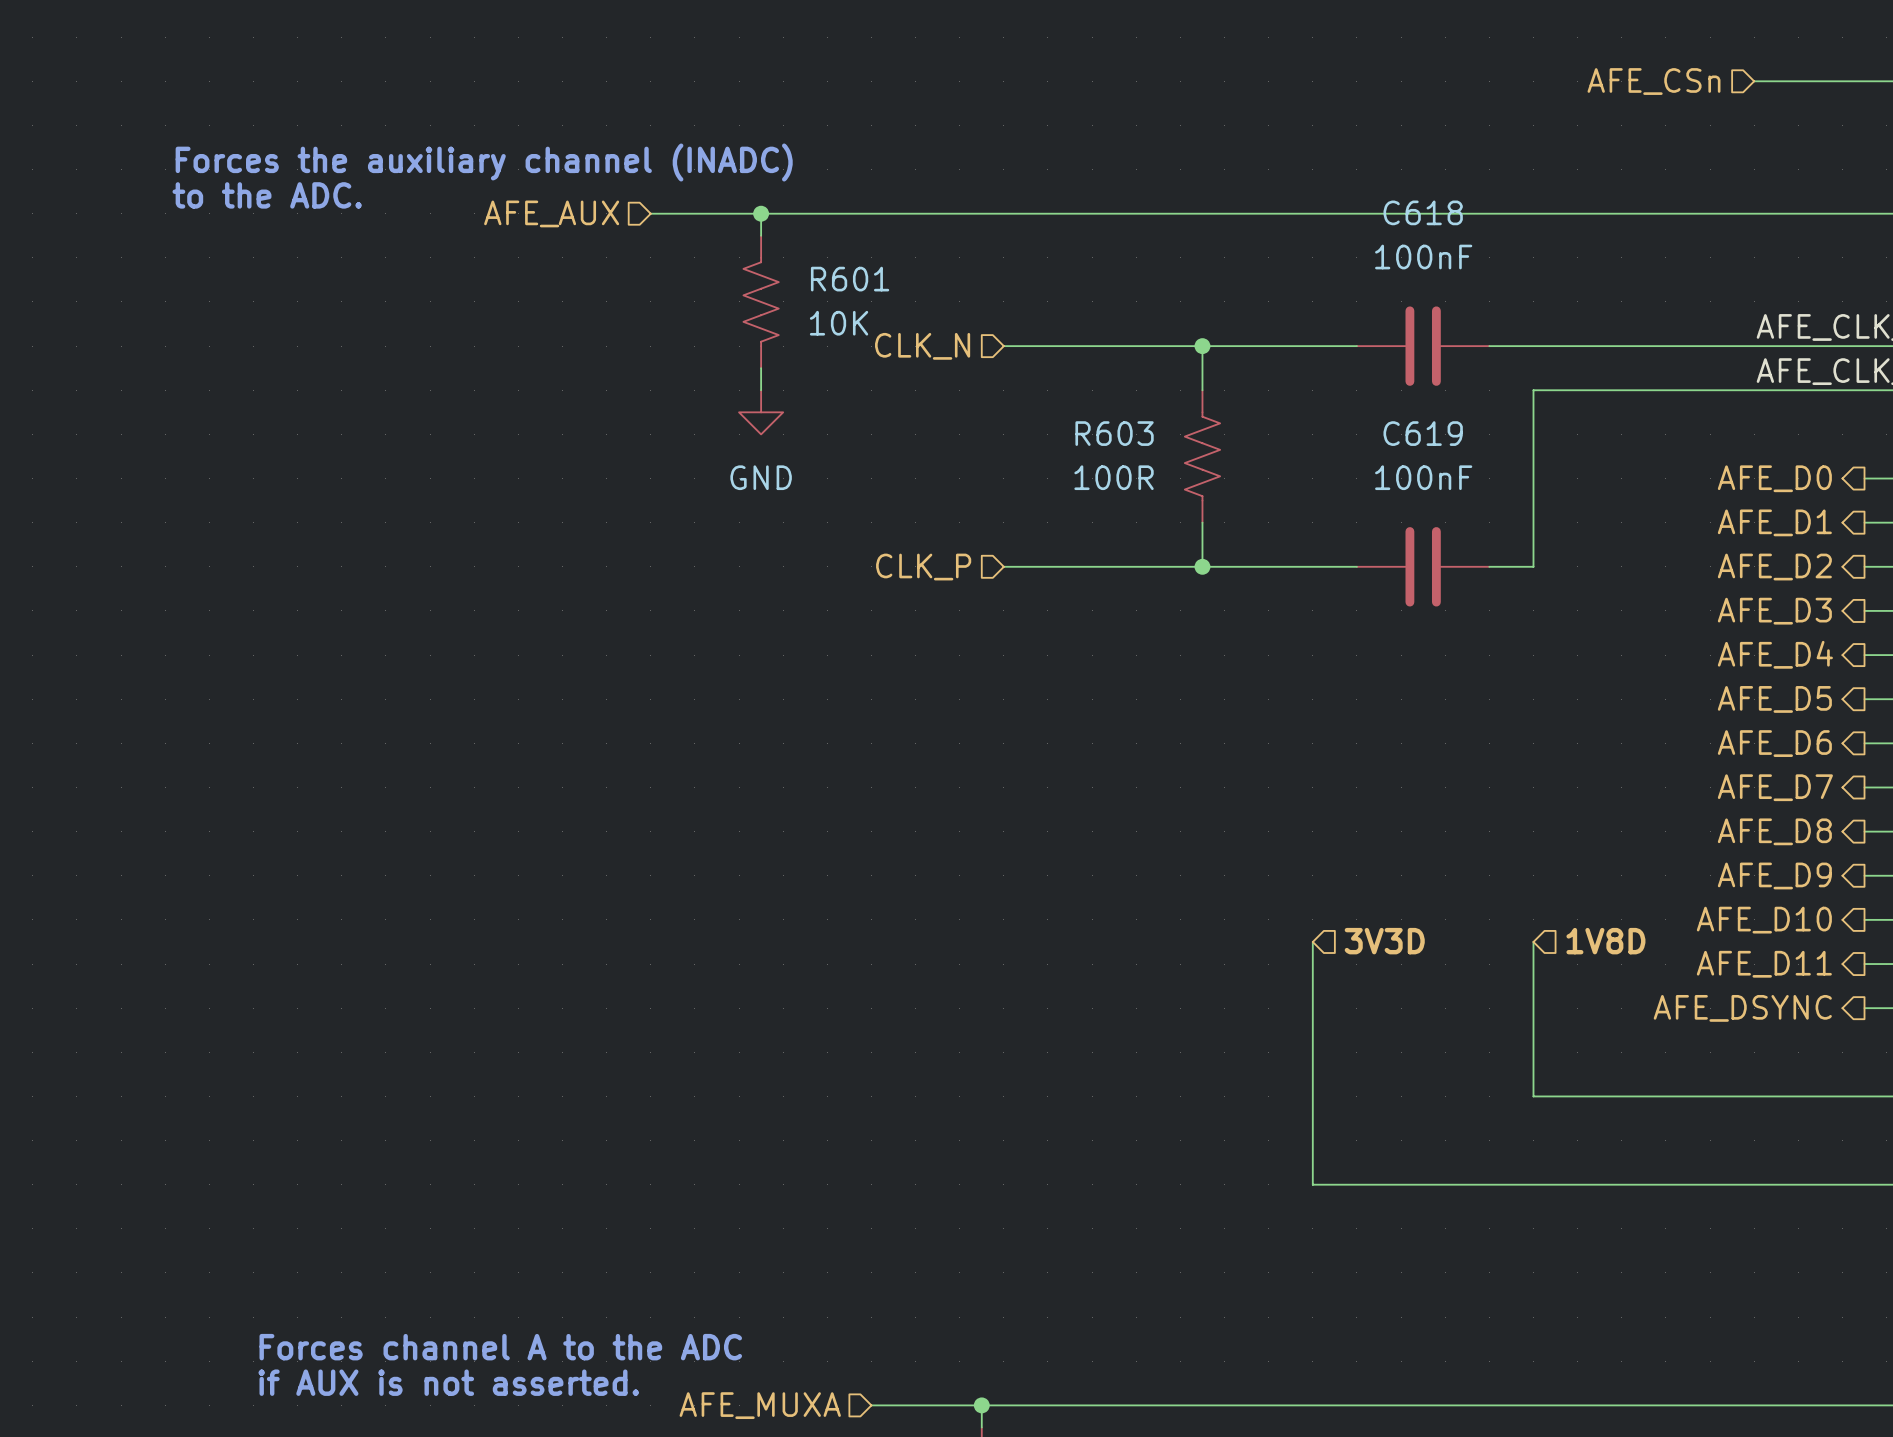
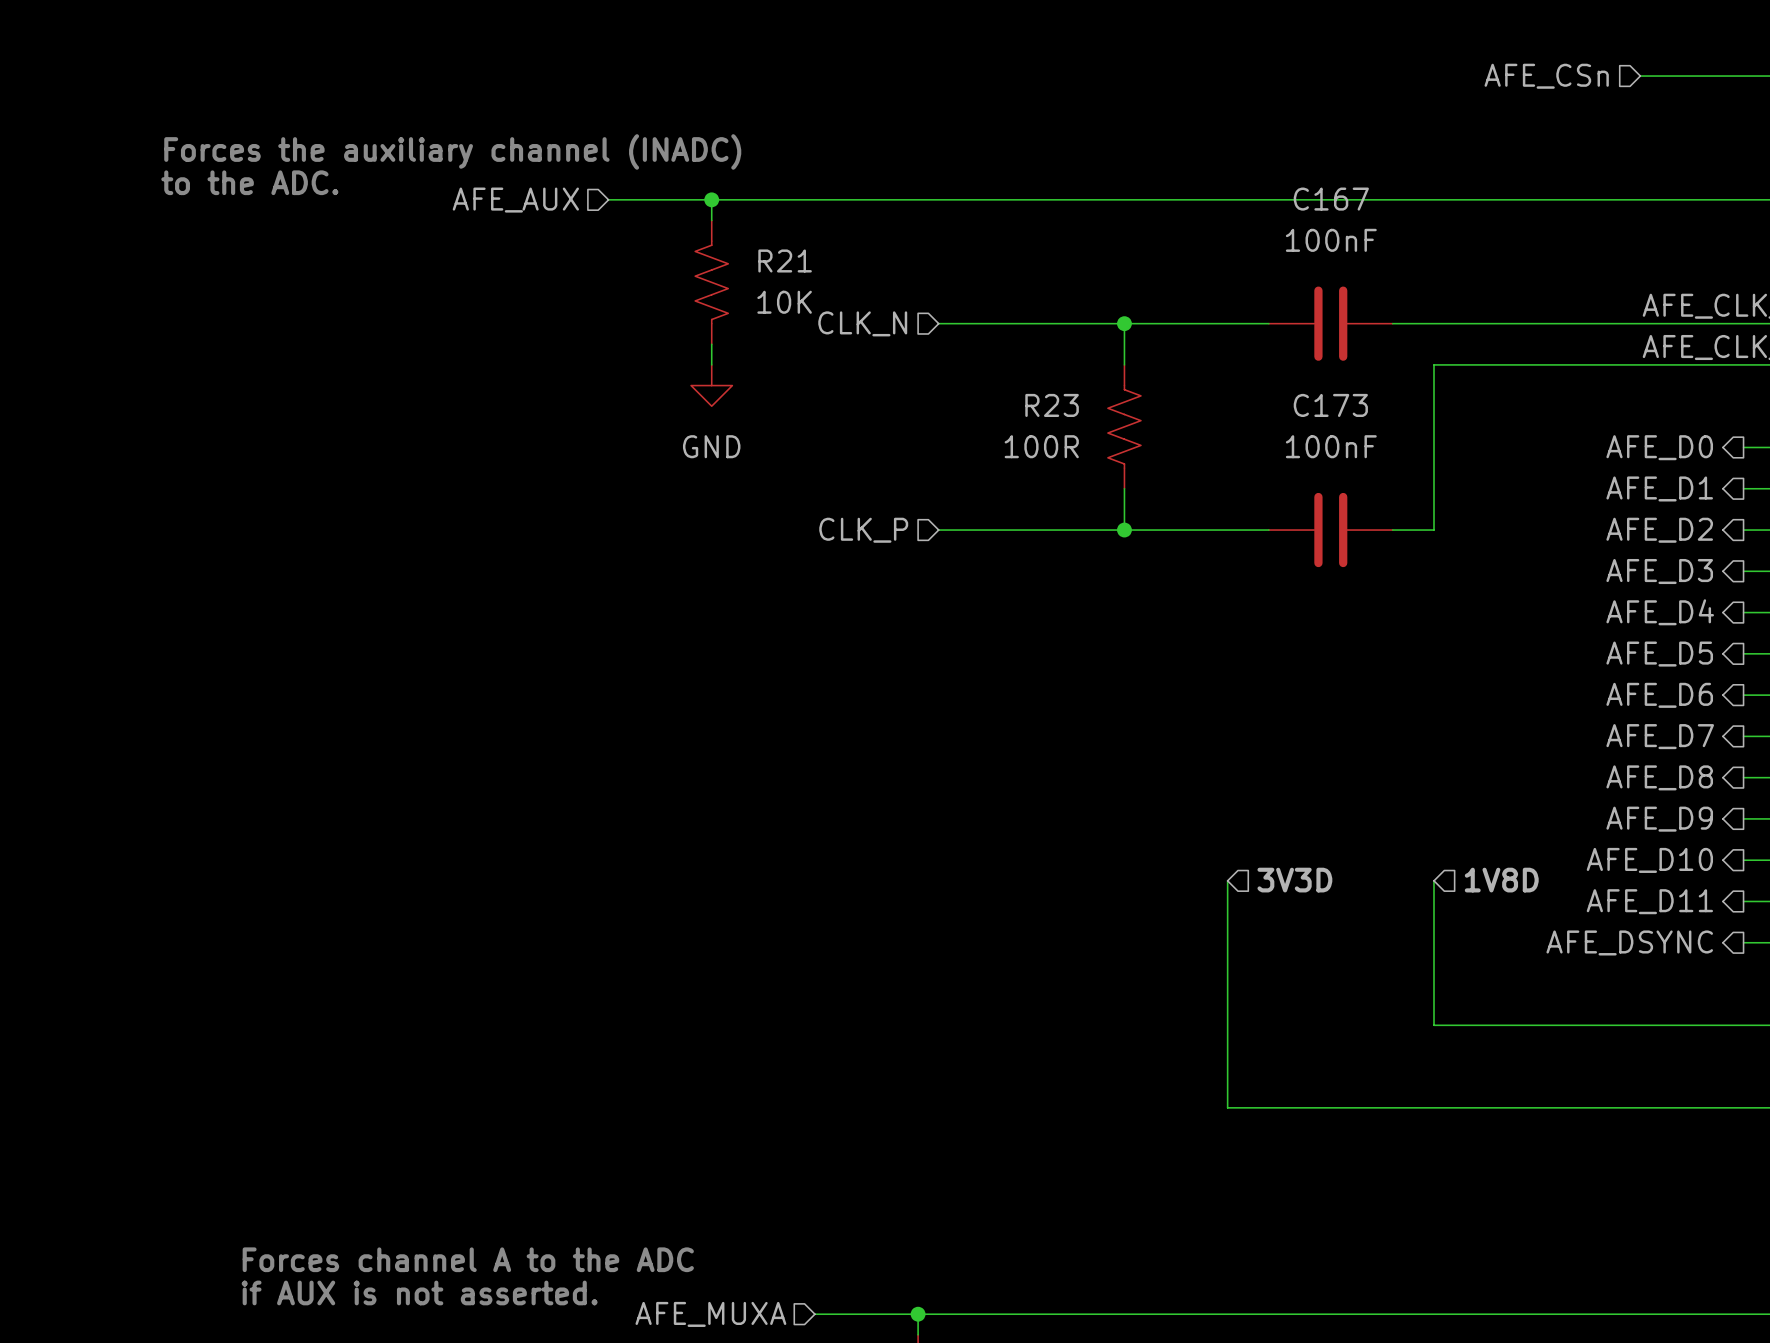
C618 name: C618 (1423, 212) -> C167 (1331, 199)
R601 name: R601 (850, 279) -> R21 (785, 260)
R603 name: R603 (1114, 433) -> R23 (1052, 405)
C619 name: C619 (1423, 433) -> C173 (1330, 405)

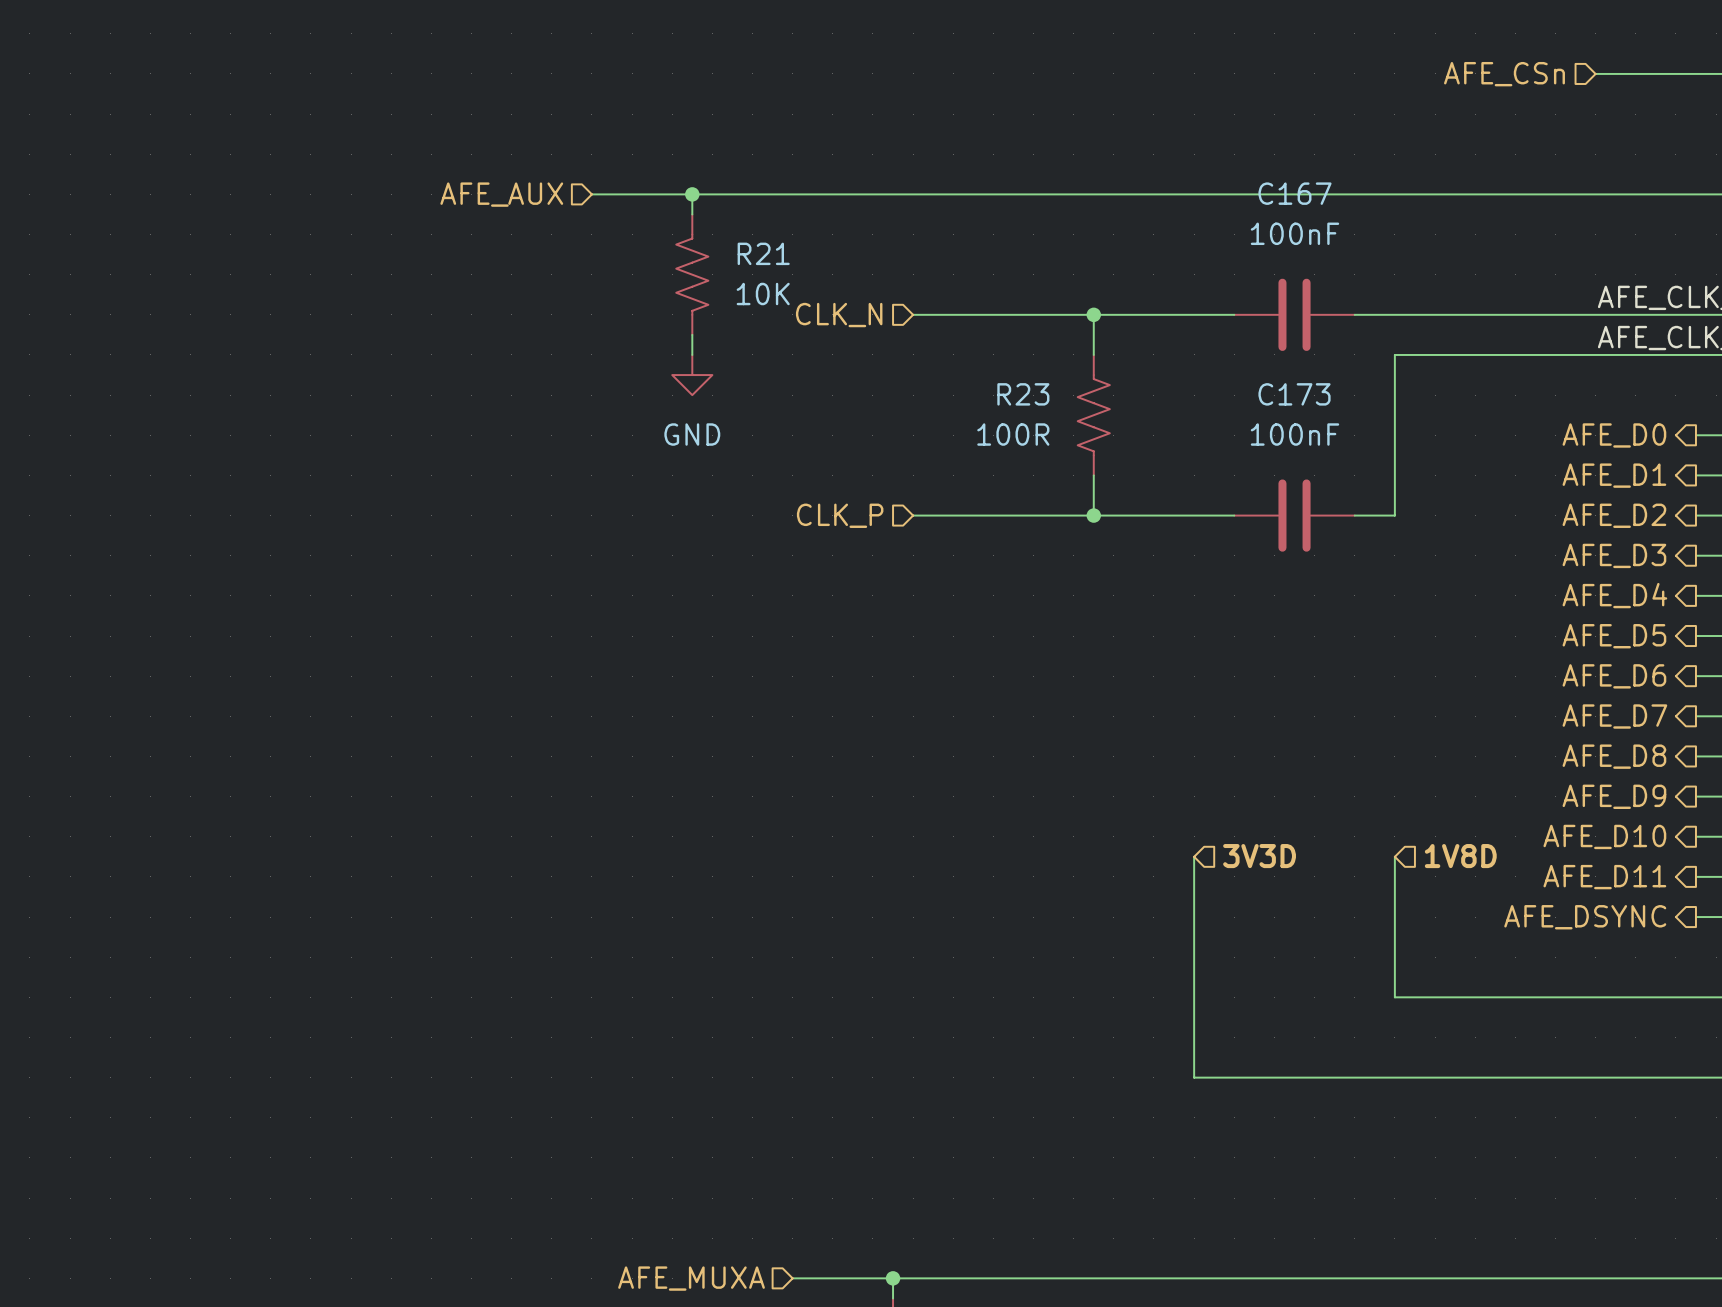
text: Forces the auxiliary channel (INADC) (452, 151) -> none
text: to the ADC. (249, 182) -> none
text: Forces channel A to the ADC (468, 1259) -> none
text: if AUX is not asserted. (419, 1292) -> none

